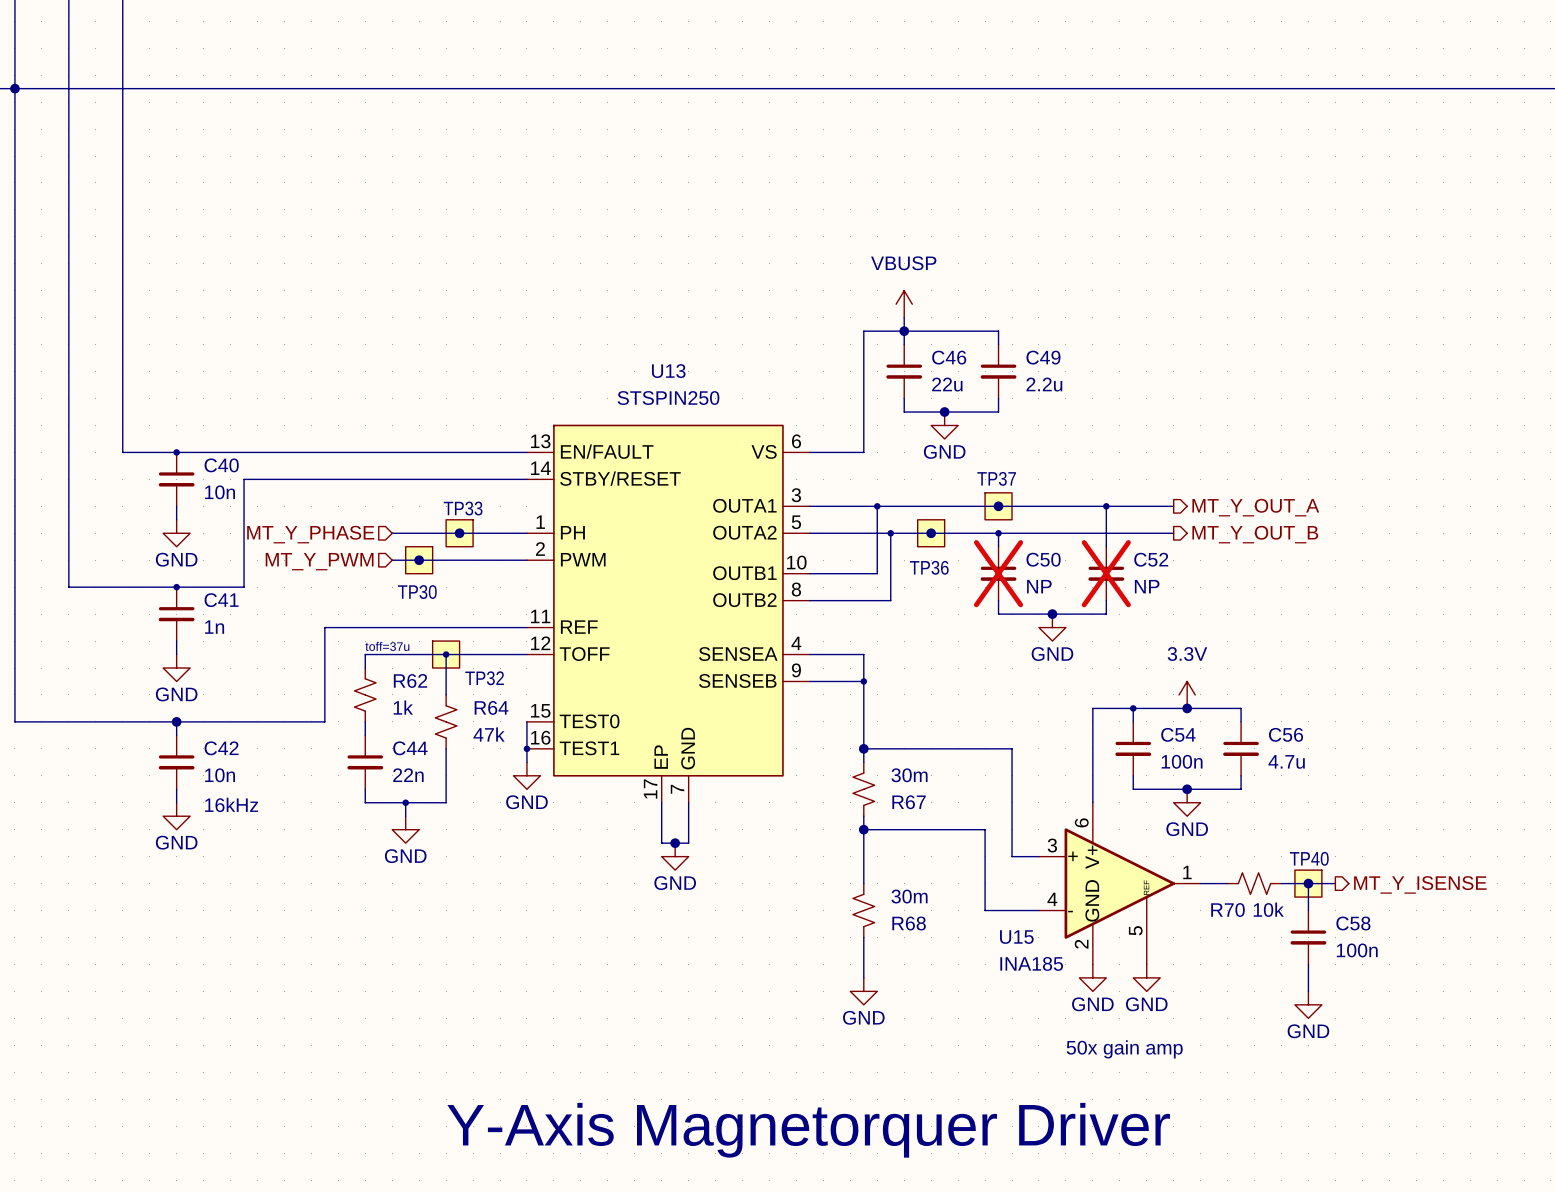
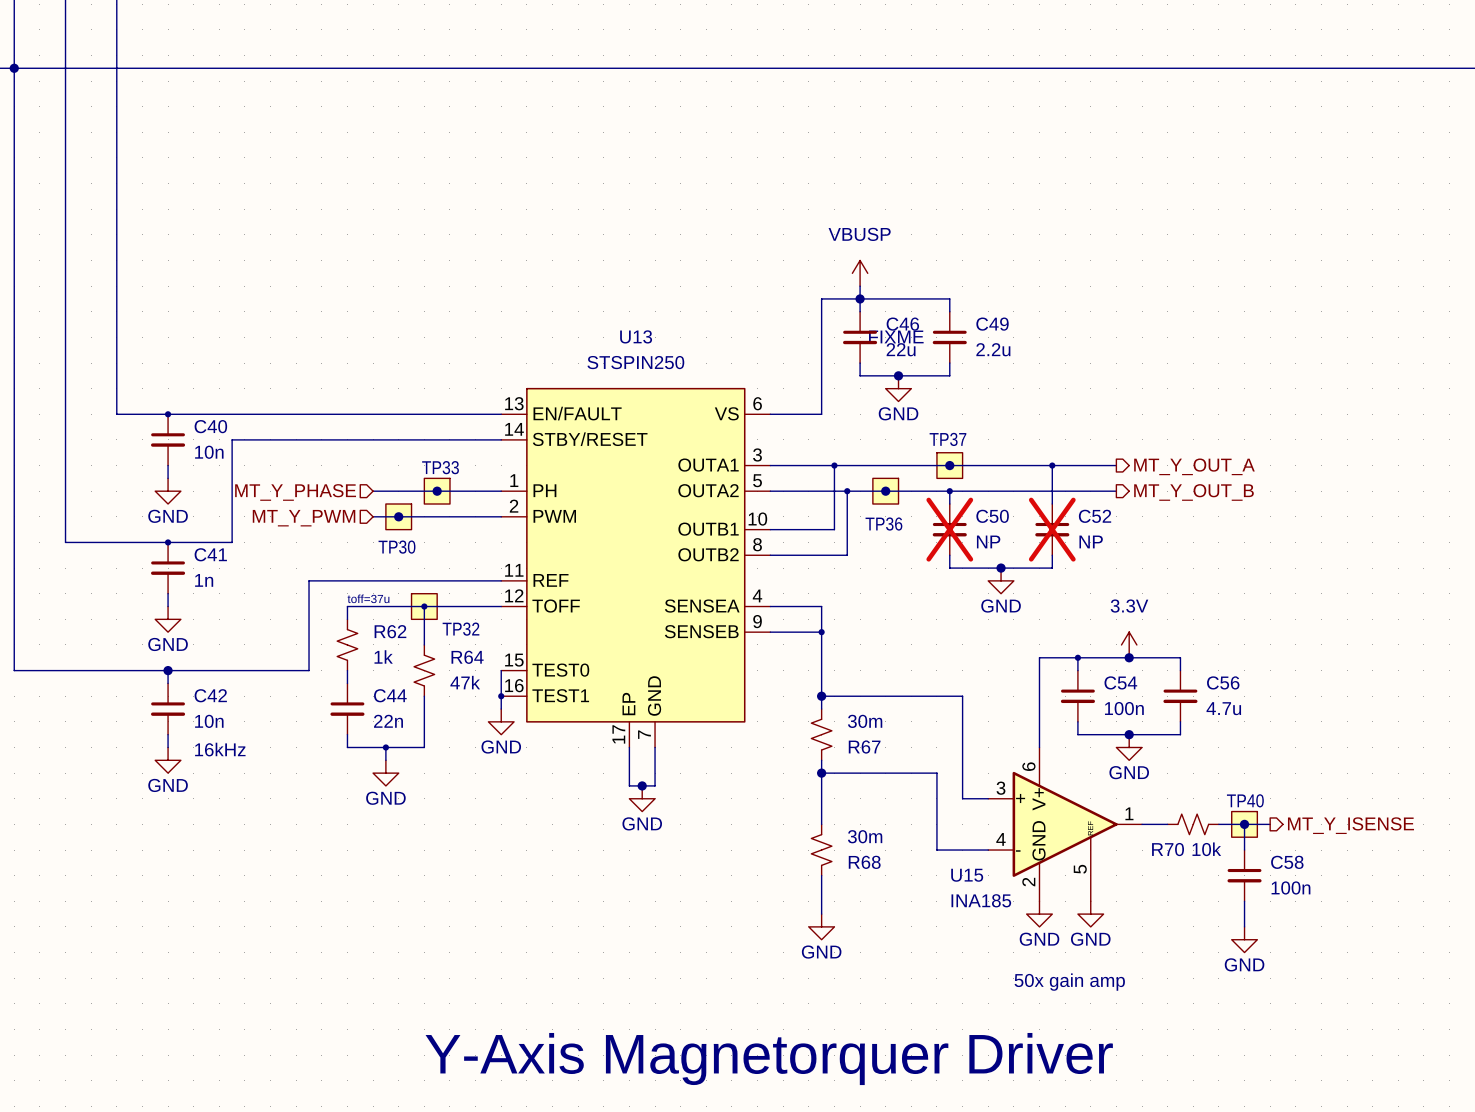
text: none -> FIXME (896, 336)

